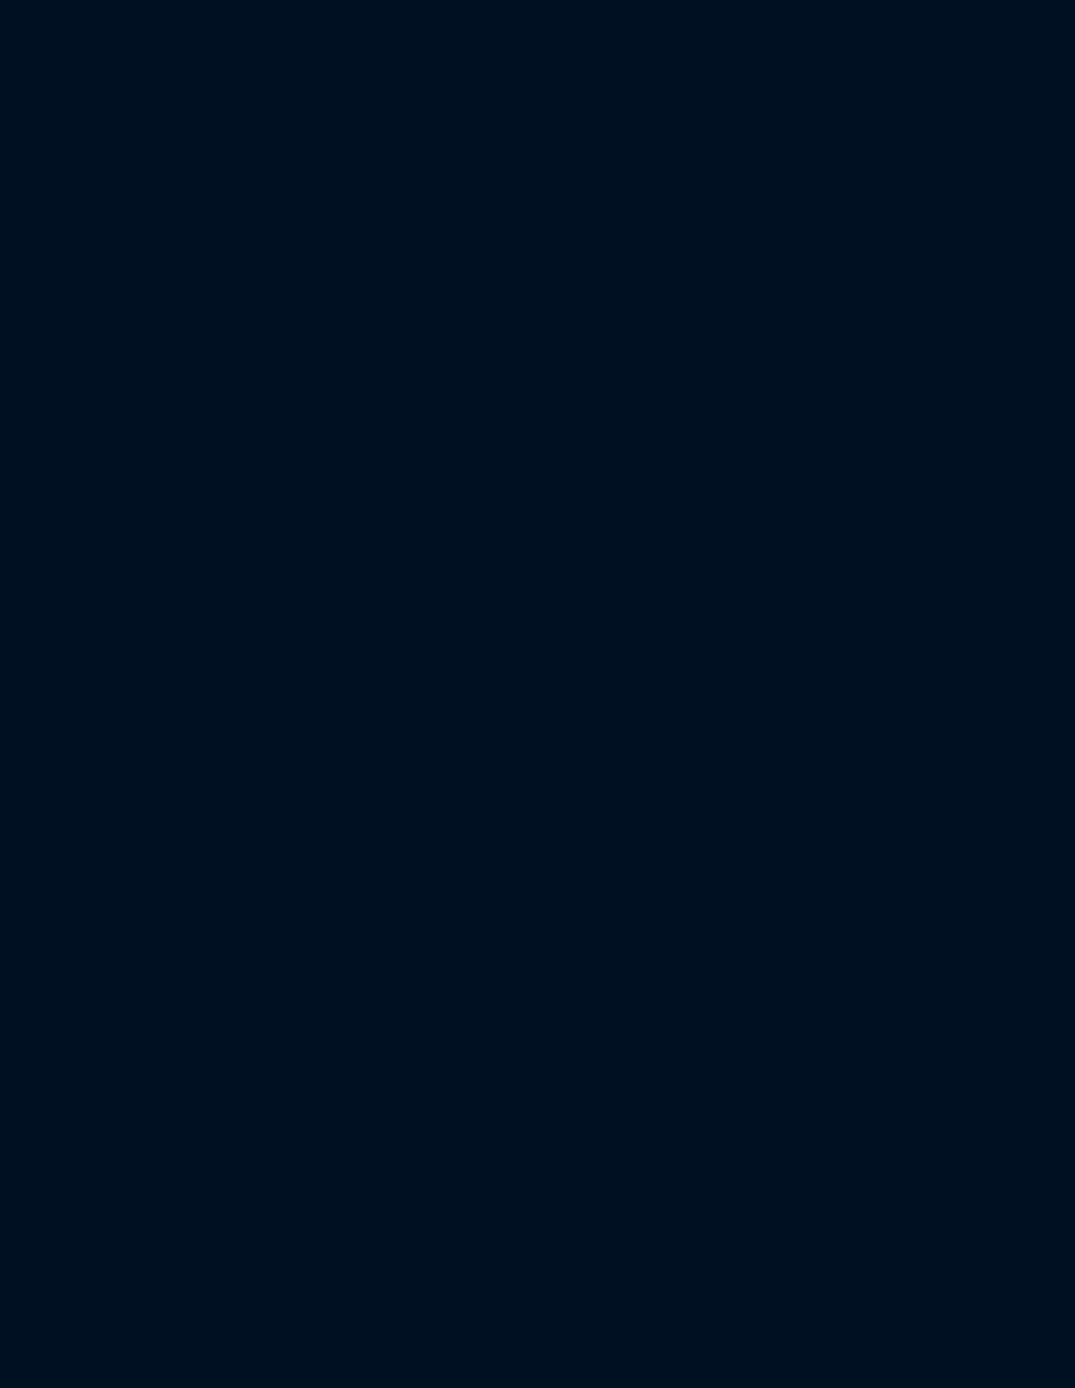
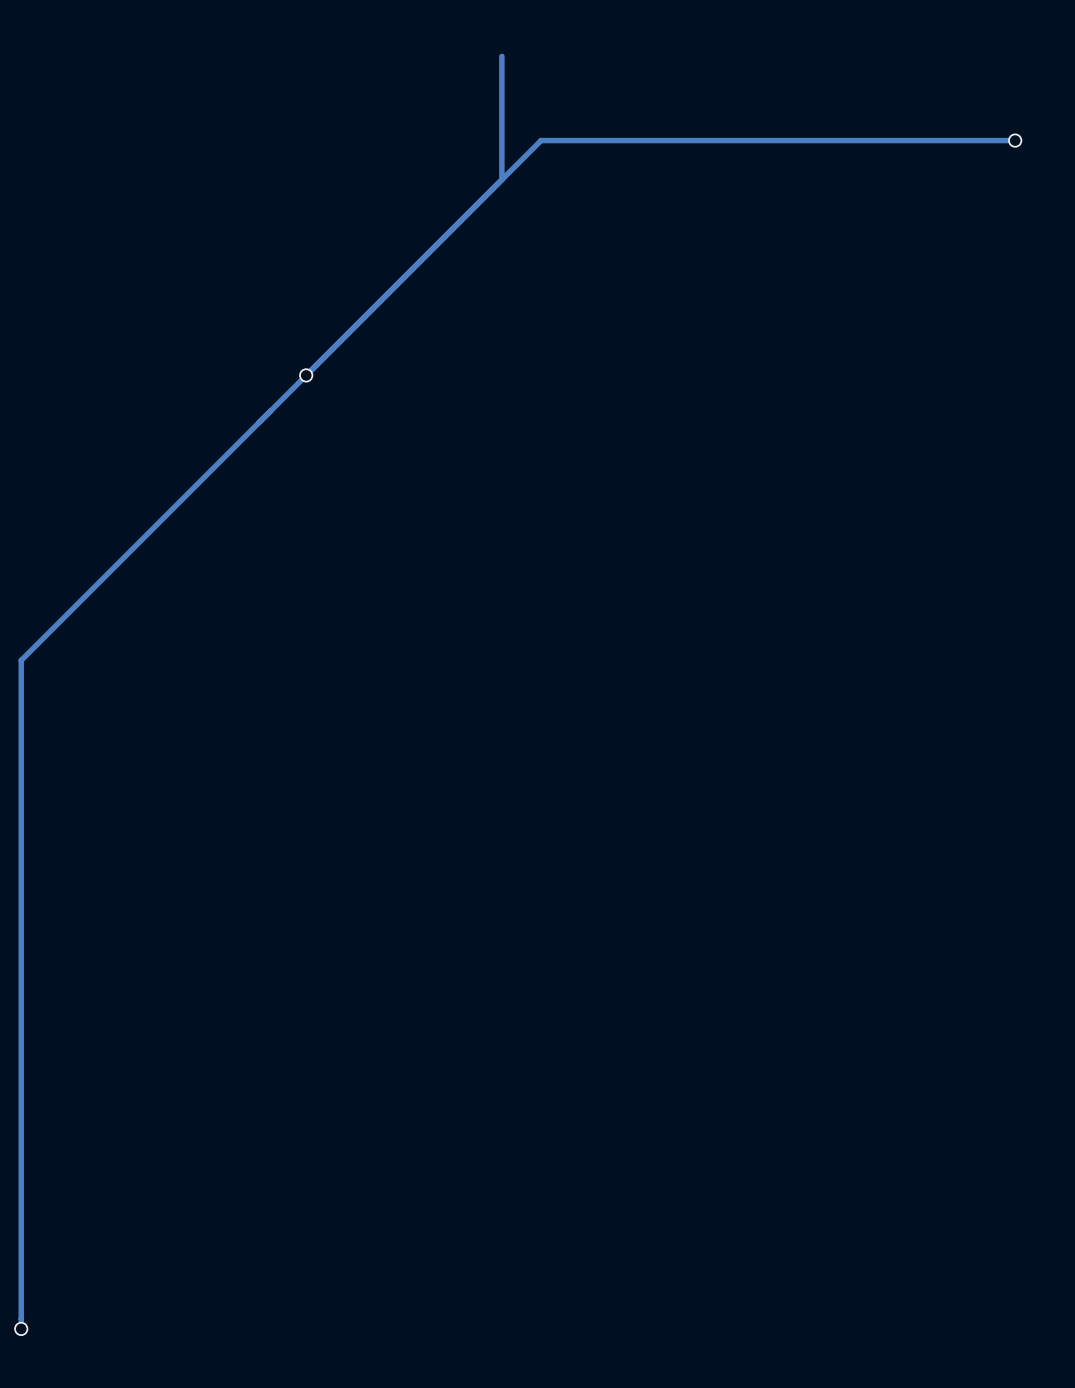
track: none -> (501, 56) (501, 179)
track: none -> (1015, 140) (541, 140) (21, 660) (21, 1328)
via: none -> (1015, 140)
via: none -> (306, 375)
via: none -> (21, 1328)

